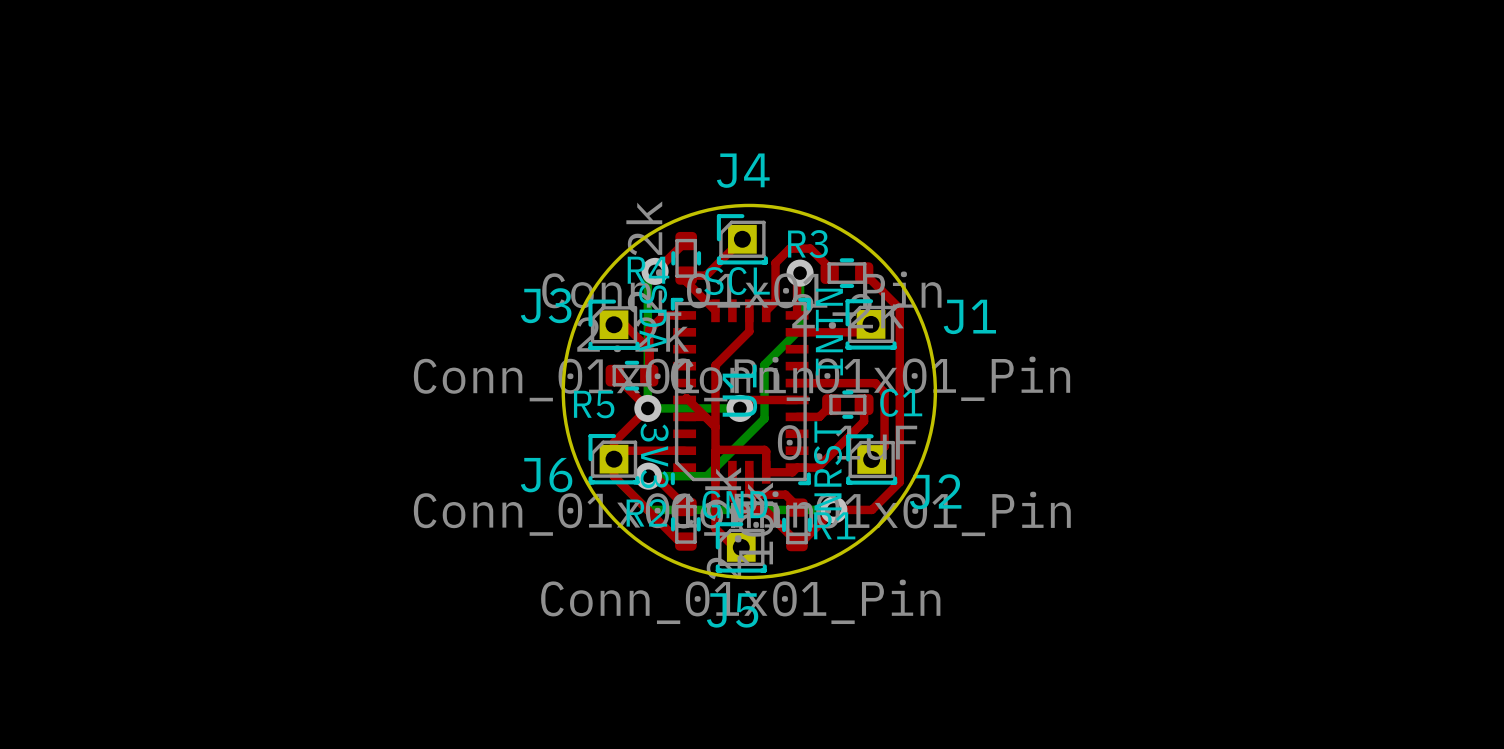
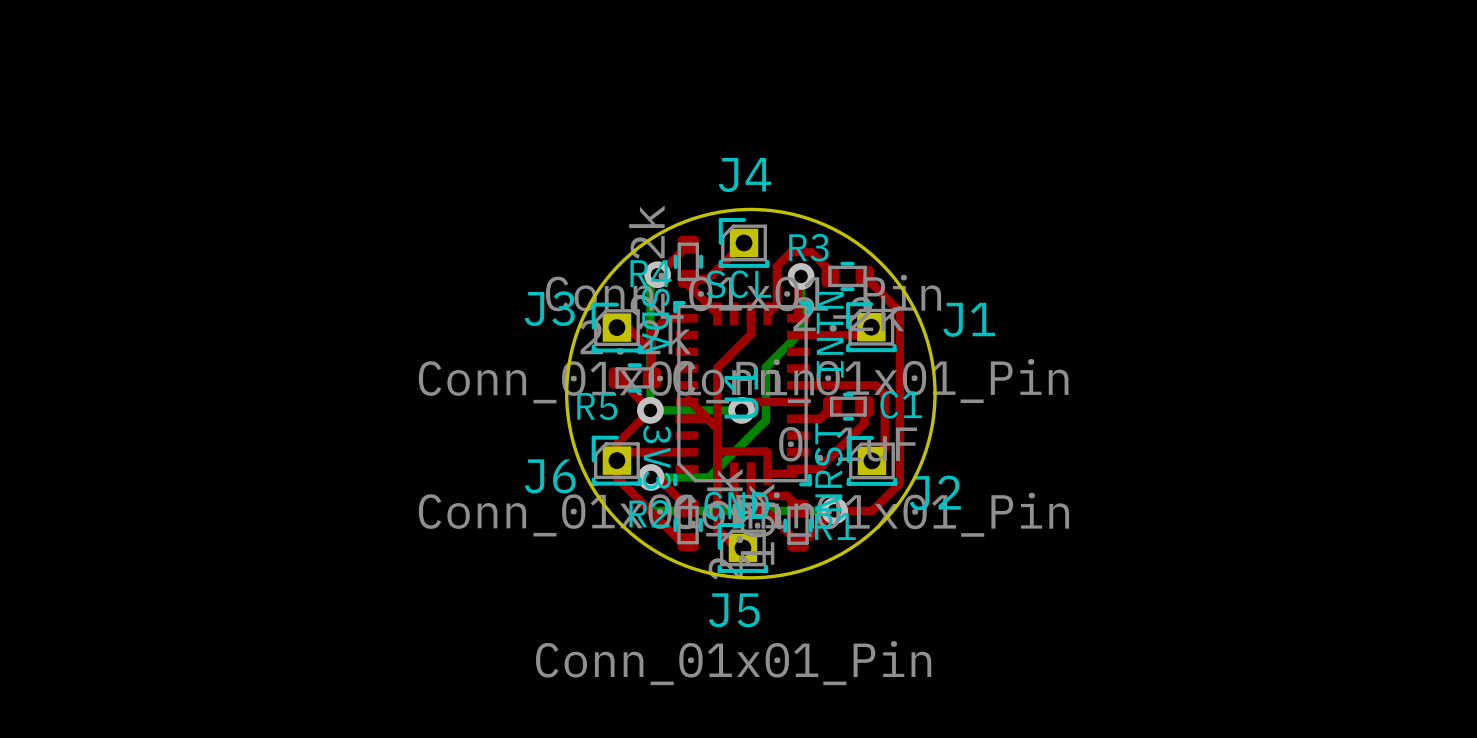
J5 value position: Conn_01x01_Pin (740, 601) -> Conn_01x01_Pin (733, 663)

